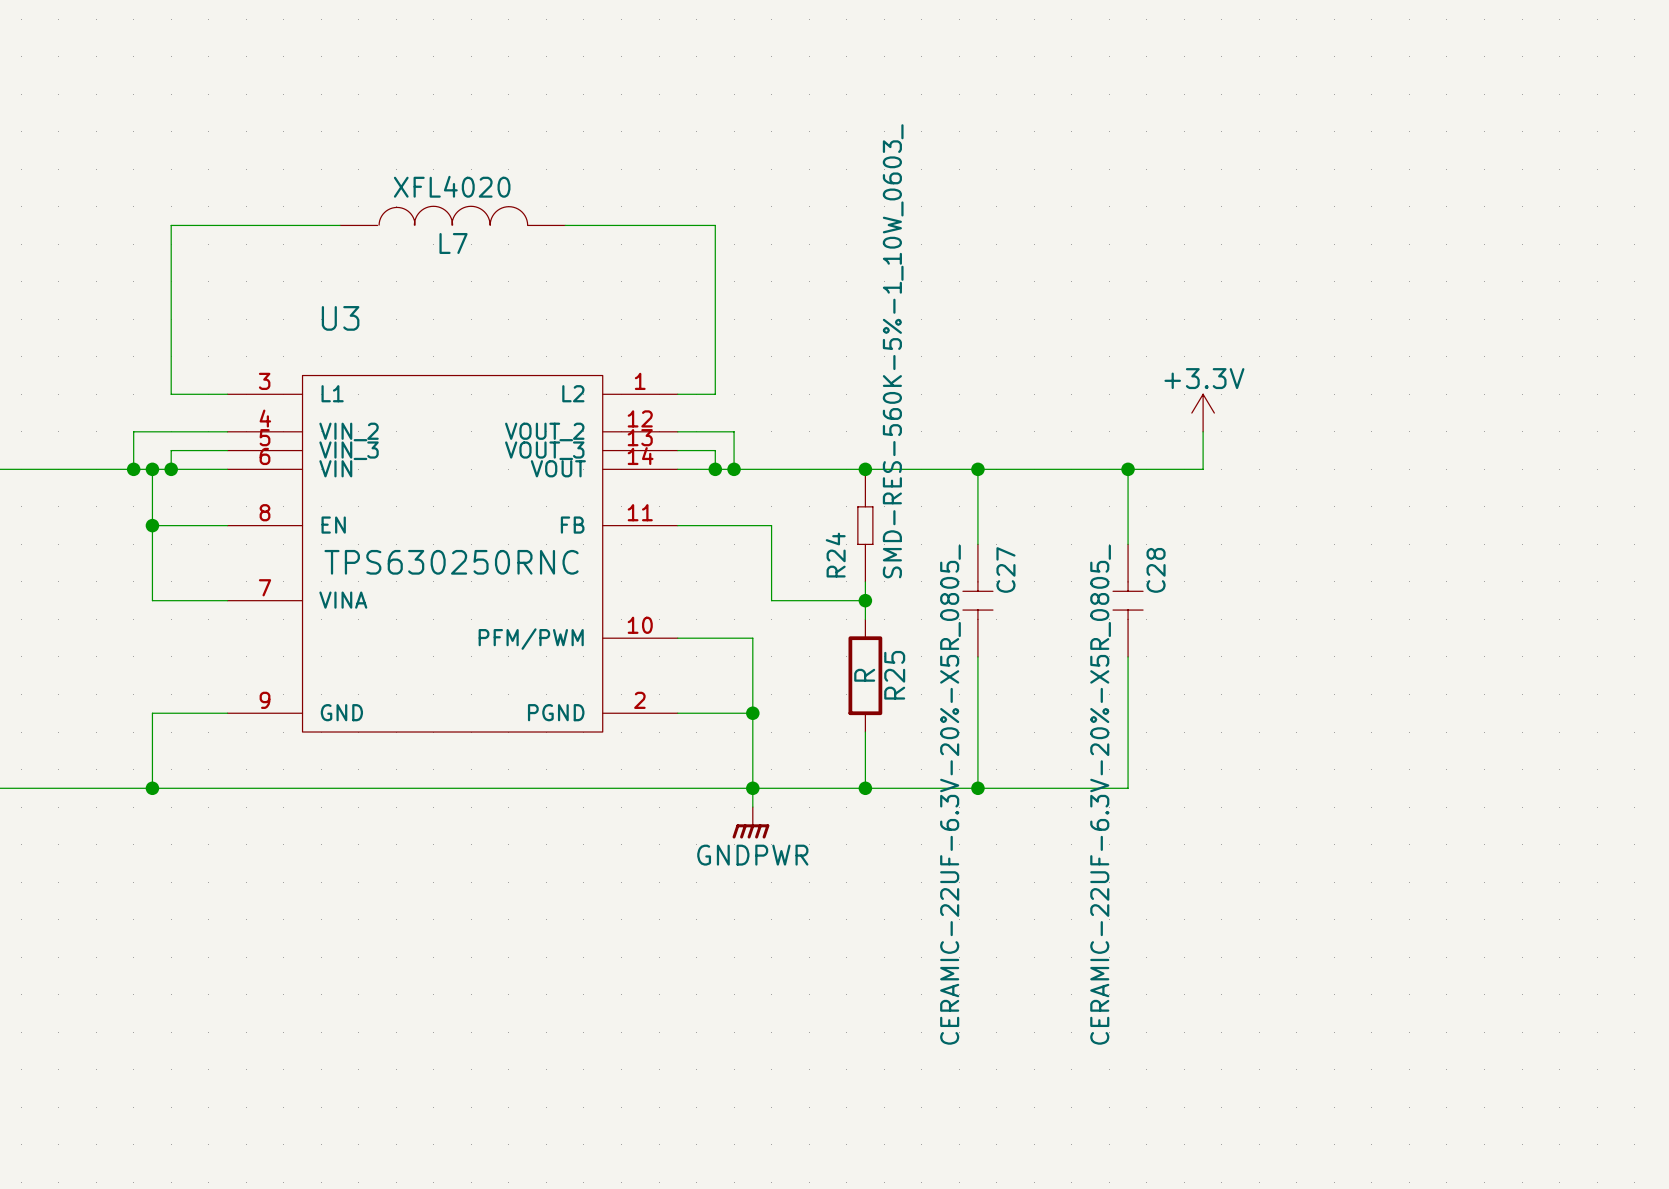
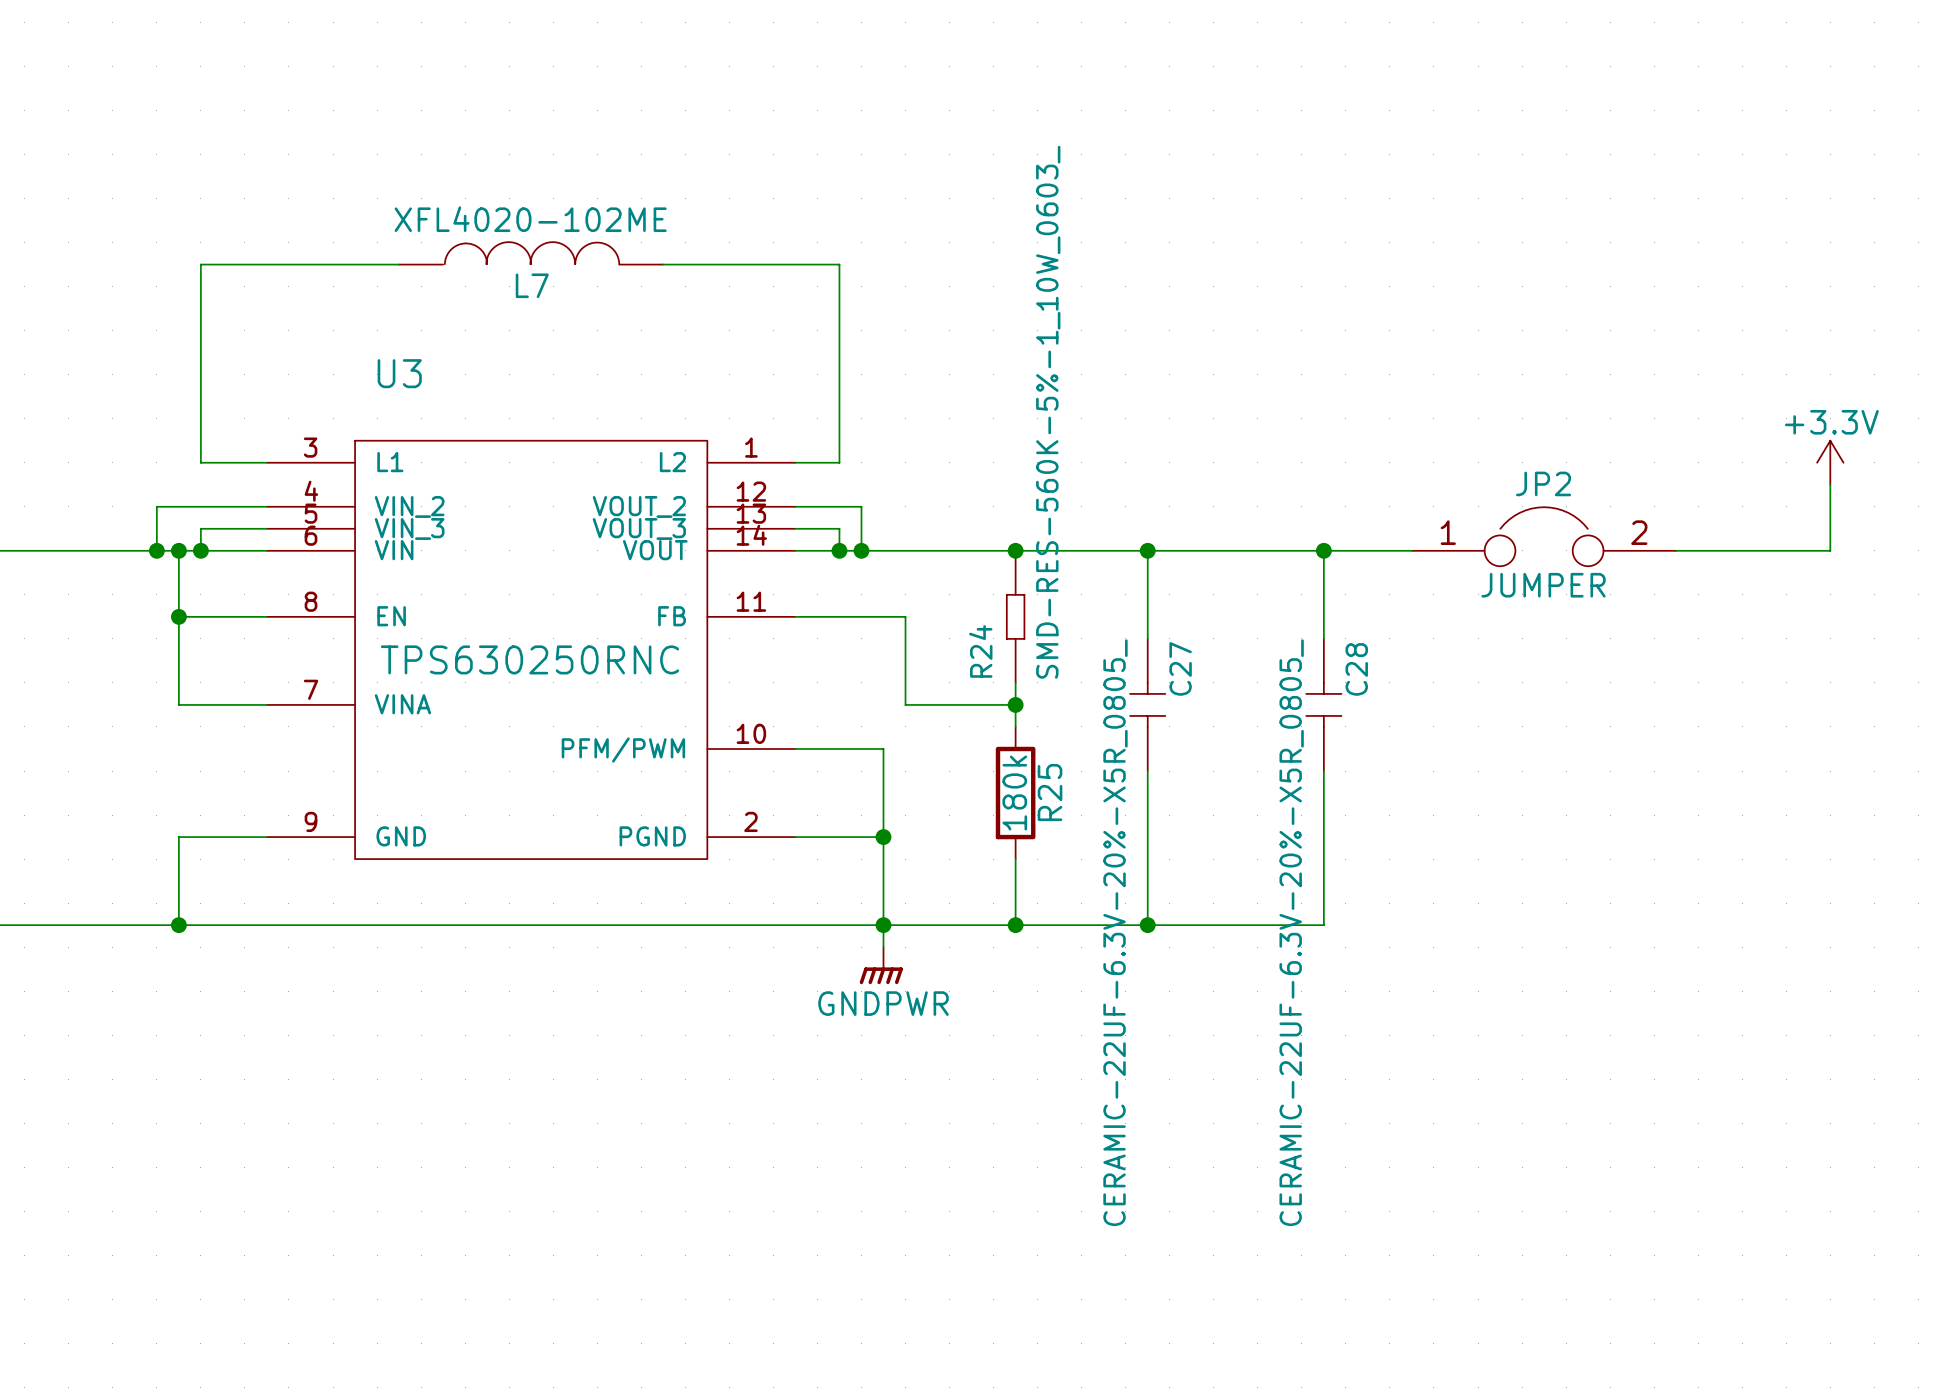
L7 value: XFL4020 (452, 186) -> XFL4020-102ME (530, 219)
power symbol position: +3.3V (1203, 413) -> +3.3V (1830, 462)
wire: none -> (1830, 484) (1830, 550) (1676, 550)
wire: (1203, 431) (1203, 469) -> none
JP2: none -> JUMPER (1544, 536)
R25 value: R (864, 675) -> 180k (1014, 793)

